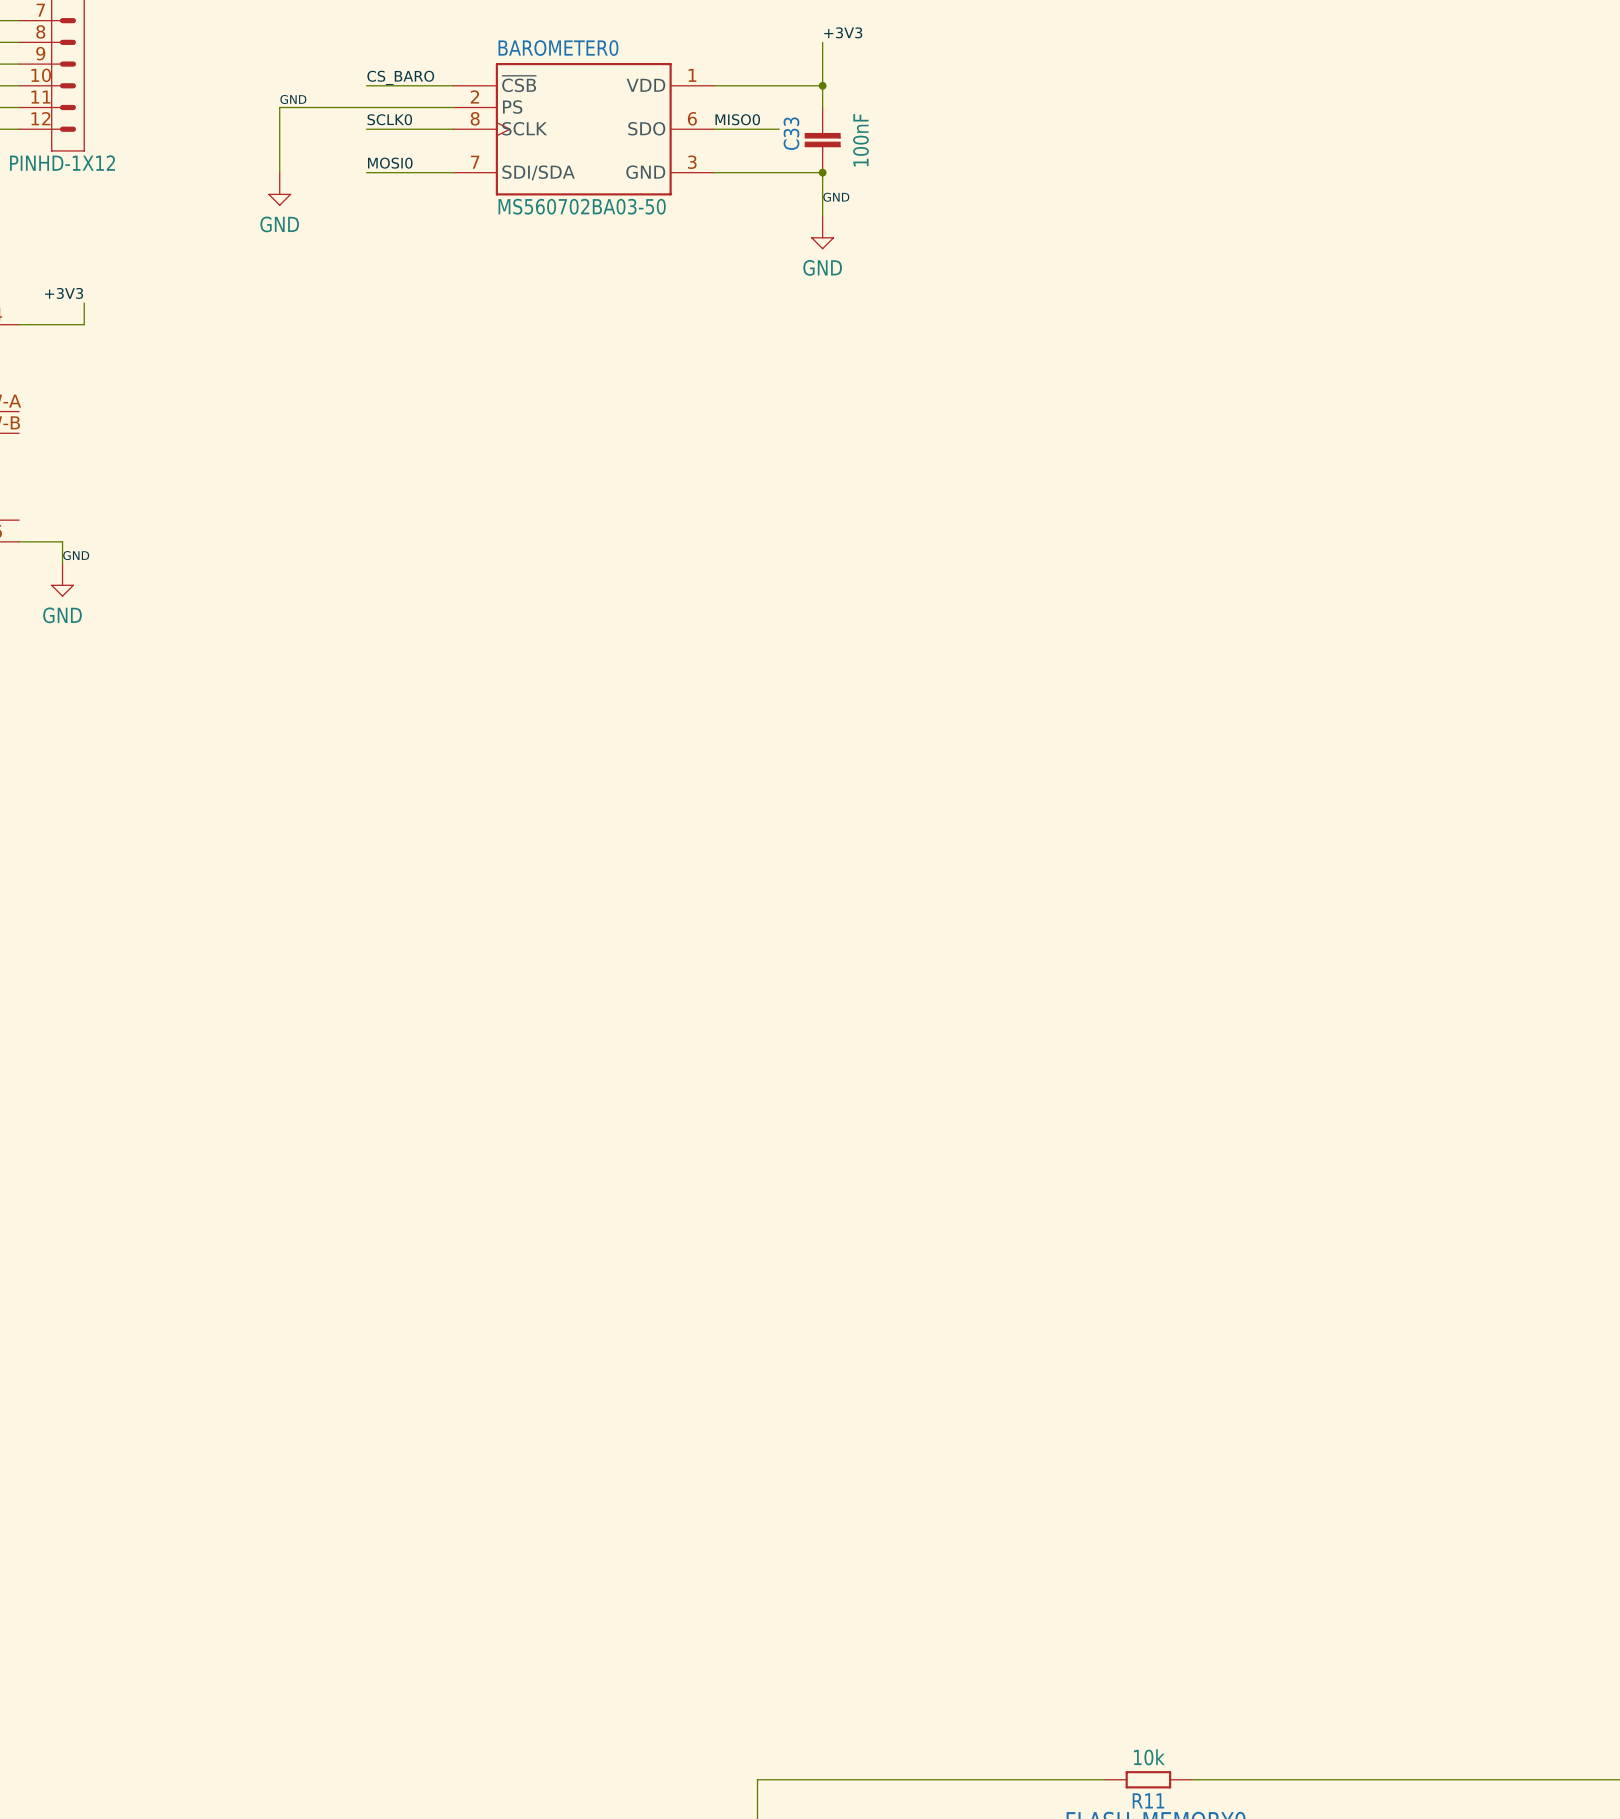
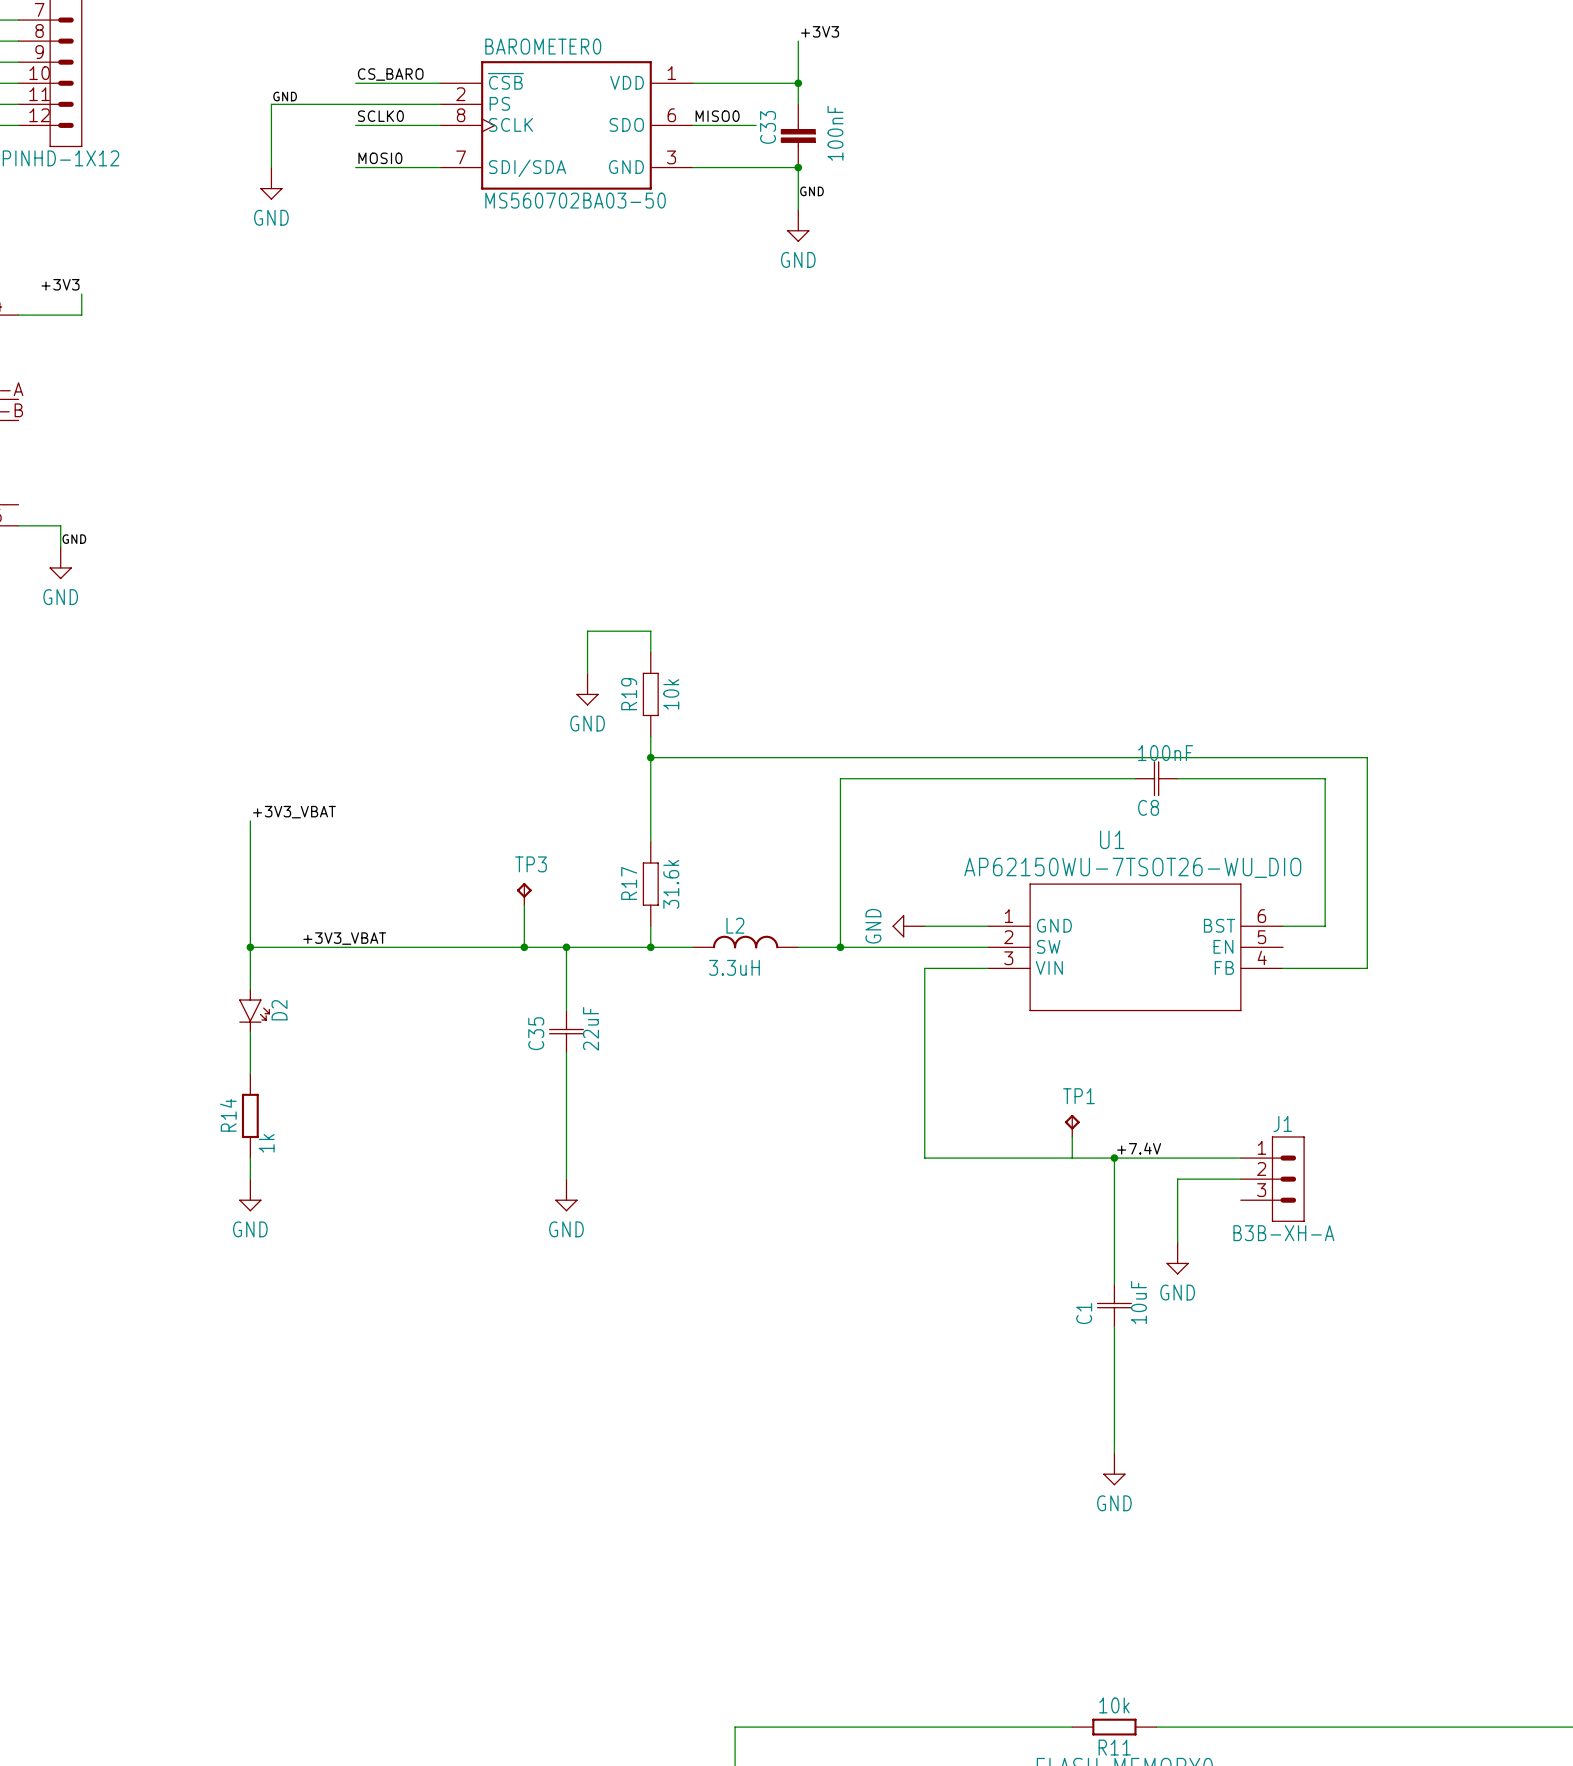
wire: none -> (650, 652) (650, 631) (587, 631) (587, 673)
power symbol: none -> GND (587, 689)
R19: none -> 10k (650, 694)
wire: none -> (650, 736) (650, 841)
wire: none -> (650, 757) (1367, 757) (1367, 968) (1283, 968)
junction: none -> (650, 757)
wire: none -> (1135, 778) (840, 778) (840, 947)
C8: none -> 100nF (1156, 778)
wire: none -> (1177, 778) (1325, 778) (1325, 926) (1283, 926)
label: none -> +3V3_VBAT (294, 812)
wire: none -> (250, 820) (250, 989)
R17: none -> 31.6k (650, 884)
TP3: none -> (524, 894)
wire: none -> (524, 905) (524, 947)
wire: none -> (650, 926) (650, 947)
power symbol: none -> GND (908, 926)
wire: none -> (924, 926) (987, 926)
label: none -> +3V3_VBAT (344, 938)
L2: none -> 3.3uH (745, 942)
wire: none -> (250, 947) (692, 947)
junction: none -> (250, 947)
junction: none -> (524, 947)
wire: none -> (566, 947) (566, 1010)
junction: none -> (566, 947)
junction: none -> (650, 947)
wire: none -> (798, 947) (987, 947)
junction: none -> (840, 947)
U1: none -> AP62150WU-7TSOT26-WU_DIO (1135, 947)
wire: none -> (987, 968) (924, 968) (924, 1158) (1240, 1158)
D2: none -> (254, 1010)
wire: none -> (250, 1031) (250, 1073)
C35: none -> 22uF (566, 1031)
wire: none -> (566, 1052) (566, 1179)
R14: none -> 1k (250, 1115)
TP1: none -> (1072, 1125)
wire: none -> (1072, 1136) (1072, 1158)
label: none -> +7.4V (1139, 1148)
wire: none -> (250, 1158) (250, 1179)
wire: none -> (1114, 1158) (1114, 1284)
junction: none -> (1114, 1158)
wire: none -> (1240, 1179) (1177, 1179) (1177, 1242)
J1: none -> B3B-XH-A (1272, 1179)
power symbol: none -> GND (250, 1195)
power symbol: none -> GND (566, 1195)
power symbol: none -> GND (1177, 1258)
C1: none -> 10uF (1114, 1305)
wire: none -> (1114, 1326) (1114, 1453)
power symbol: none -> GND (1114, 1469)

